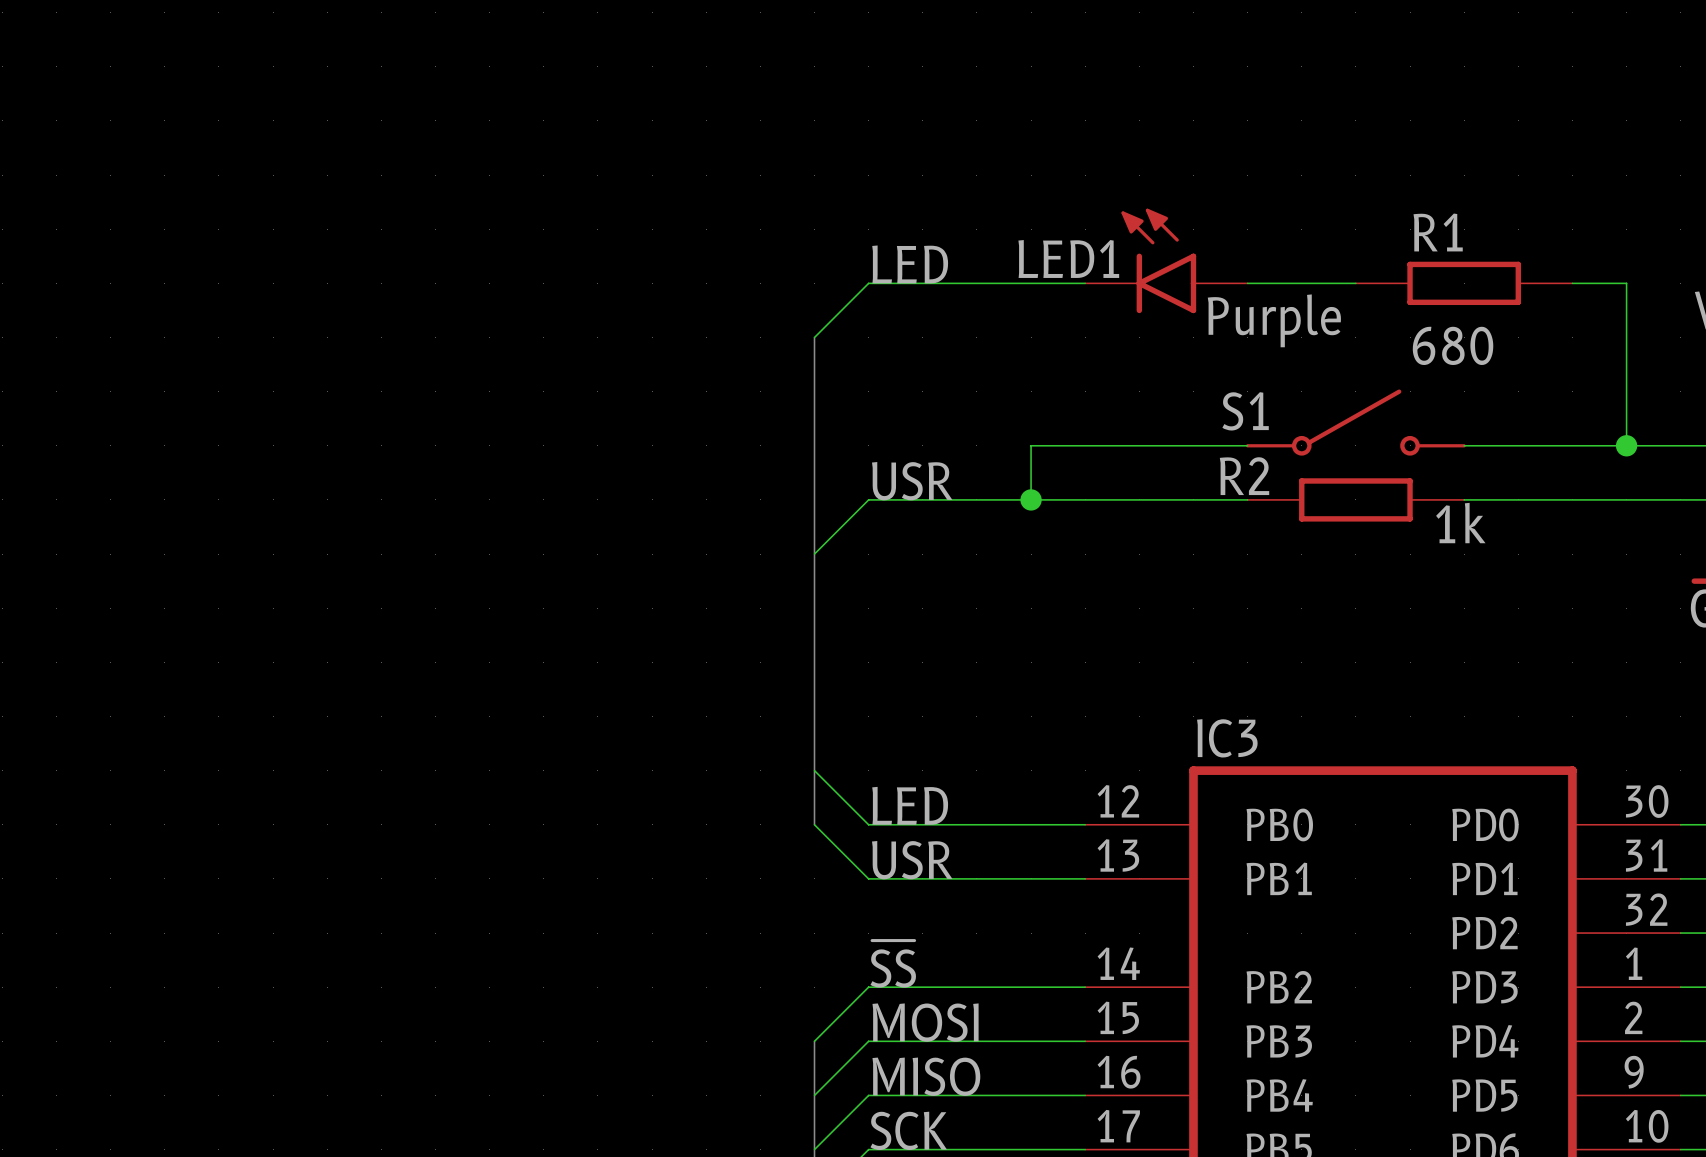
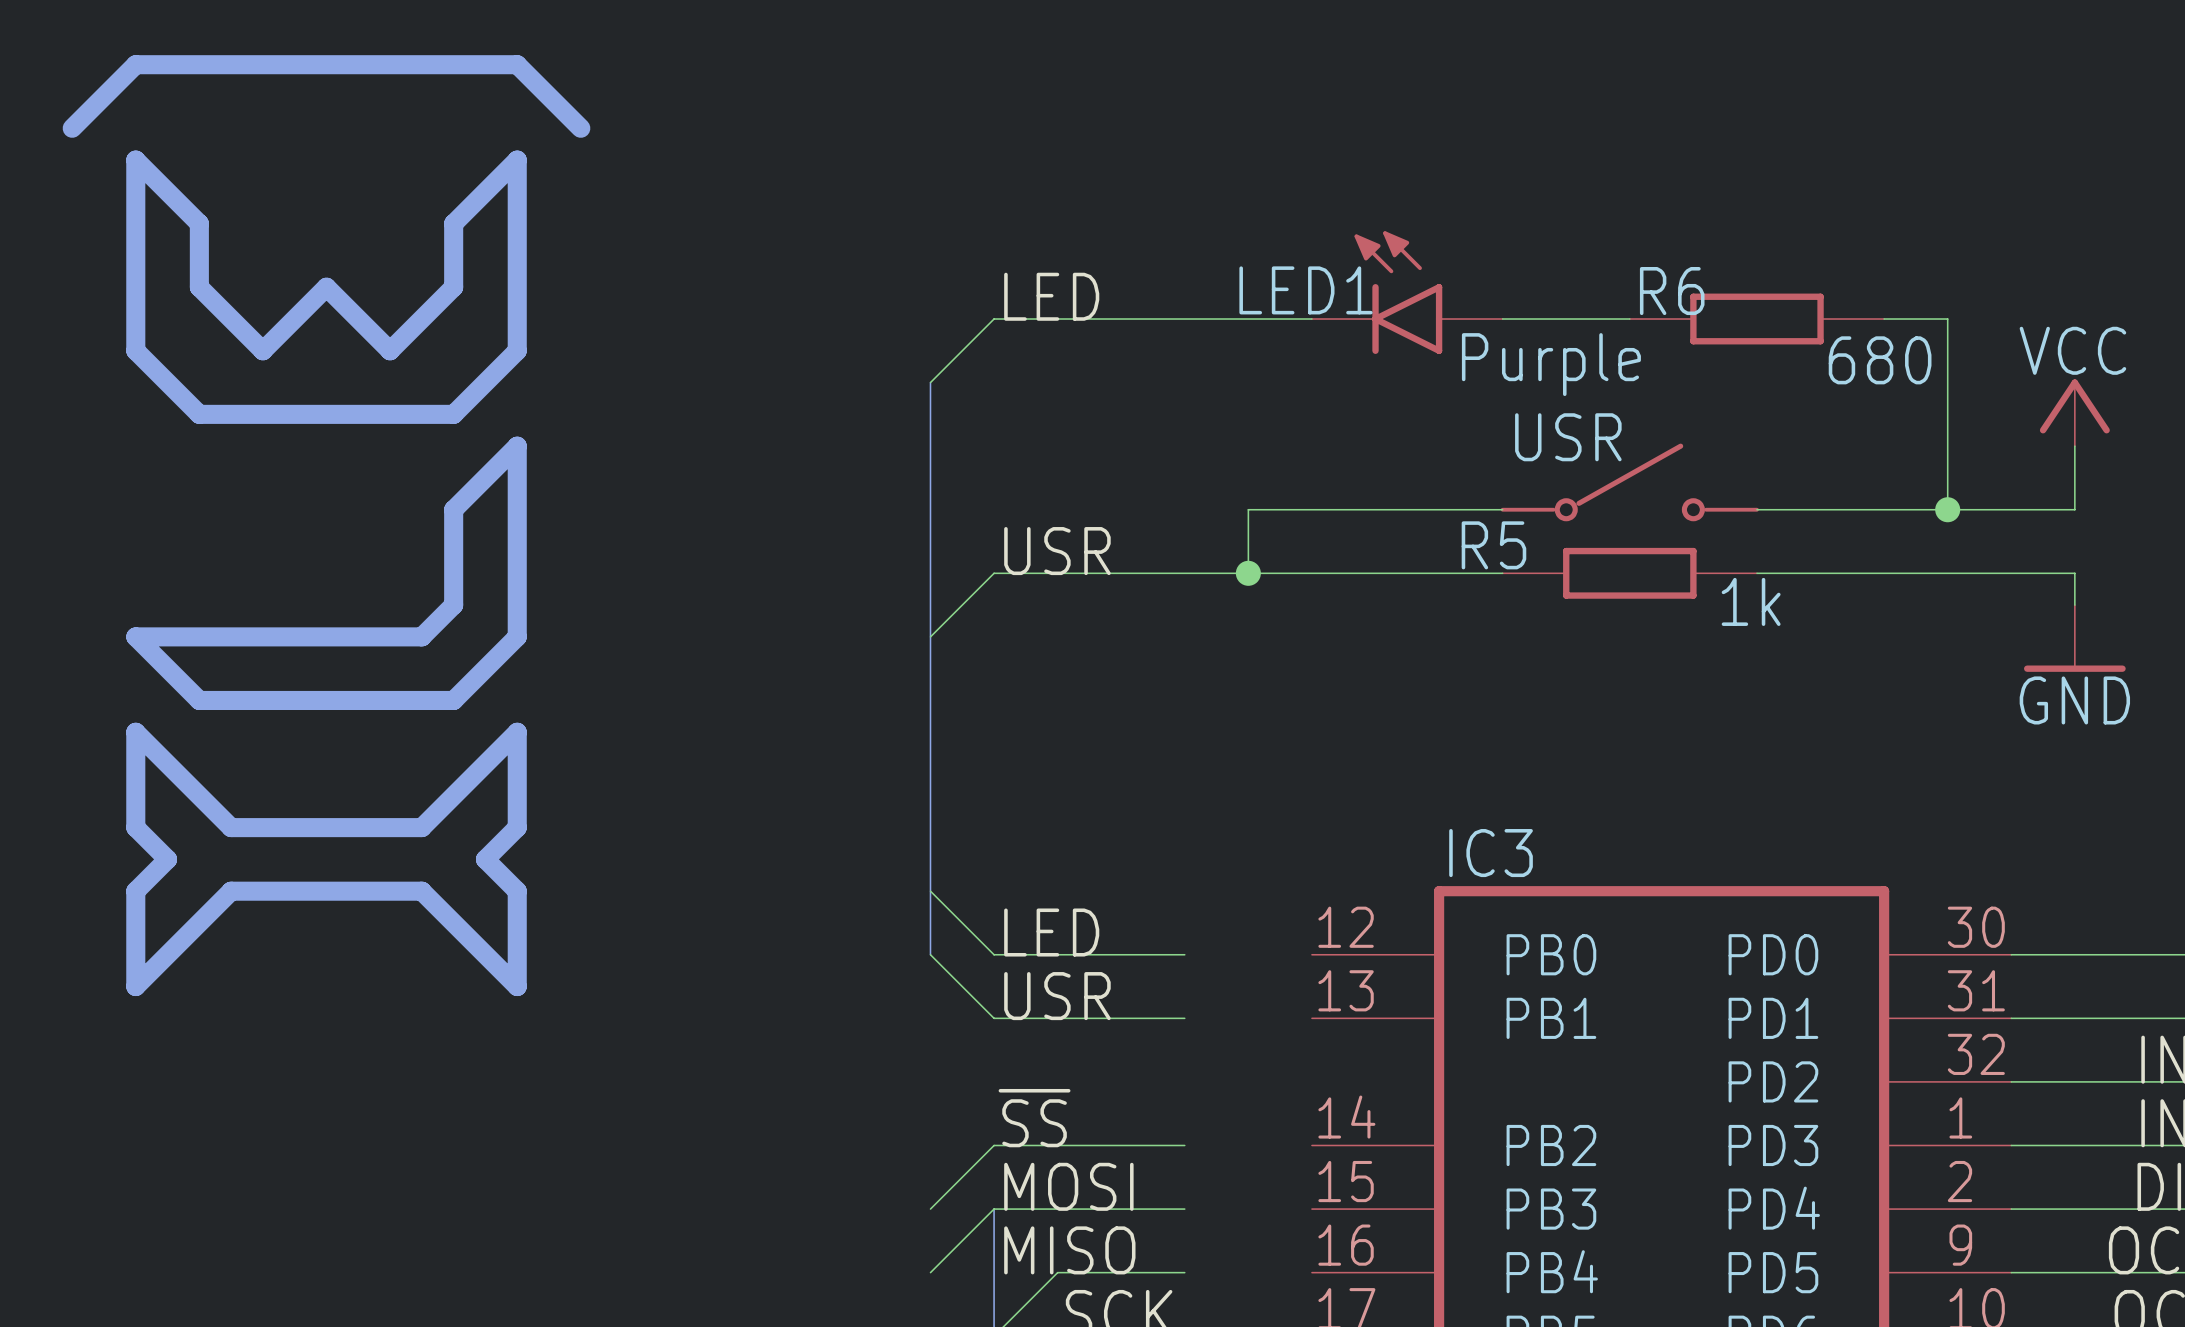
line: none -> (72, 128) (135, 64) (517, 64) (580, 128)
line: none -> (135, 160) (135, 350) (199, 414) (453, 414) (517, 350) (517, 160) (453, 223) (453, 287) (390, 350) (326, 287) (262, 350) (199, 287) (199, 223) (135, 160)
R1 name: R1 (1438, 232) -> R6 (1672, 291)
label position: LED (910, 264) -> LED (1051, 296)
wire: (868, 283) (814, 337) -> (1057, 319) (994, 319) (930, 382)
bus: (814, 337) (814, 824) -> (930, 382) (930, 954)
R1 value position: 680 (1453, 345) -> 680 (1880, 360)
line: none -> (517, 446) (517, 636) (453, 700) (199, 700) (135, 636) (421, 636) (453, 605) (453, 509) (517, 446)
S1: (1355, 422) -> none
USR: none -> (1629, 482)
R2 name: R2 (1244, 476) -> R5 (1493, 545)
label position: USR (912, 481) -> USR (1057, 551)
wire: (868, 499) (814, 554) -> (1057, 573) (994, 573) (930, 636)
R2 value position: 1k (1460, 523) -> 1k (1751, 601)
line: none -> (135, 732) (135, 827) (167, 859) (135, 891) (135, 986) (231, 891) (421, 891) (517, 986) (517, 891) (485, 859) (517, 827) (517, 732) (421, 827) (231, 827) (135, 732)
wire: (814, 770) (868, 824) -> (930, 891) (994, 954) (1057, 954)
label position: LED (910, 805) -> LED (1051, 932)
wire: (814, 824) (868, 878) -> (930, 954) (994, 1018) (1057, 1018)
wire: (976, 824) (1085, 824) -> none
label position: USR (912, 860) -> USR (1057, 996)
wire: (976, 878) (1085, 878) -> none
label position: ~{SS} (893, 964) -> ~{SS} (1034, 1118)
wire: (868, 987) (814, 1041) -> (1057, 1145) (994, 1145) (930, 1209)
wire: (976, 987) (1085, 987) -> none
label position: MOSI (925, 1022) -> MOSI (1068, 1186)
wire: (868, 1041) (814, 1095) -> (1057, 1209) (994, 1209) (930, 1272)
wire: (976, 1041) (1085, 1041) -> none
label position: MISO (926, 1076) -> MISO (1069, 1250)
wire: (976, 1095) (1085, 1095) -> none

